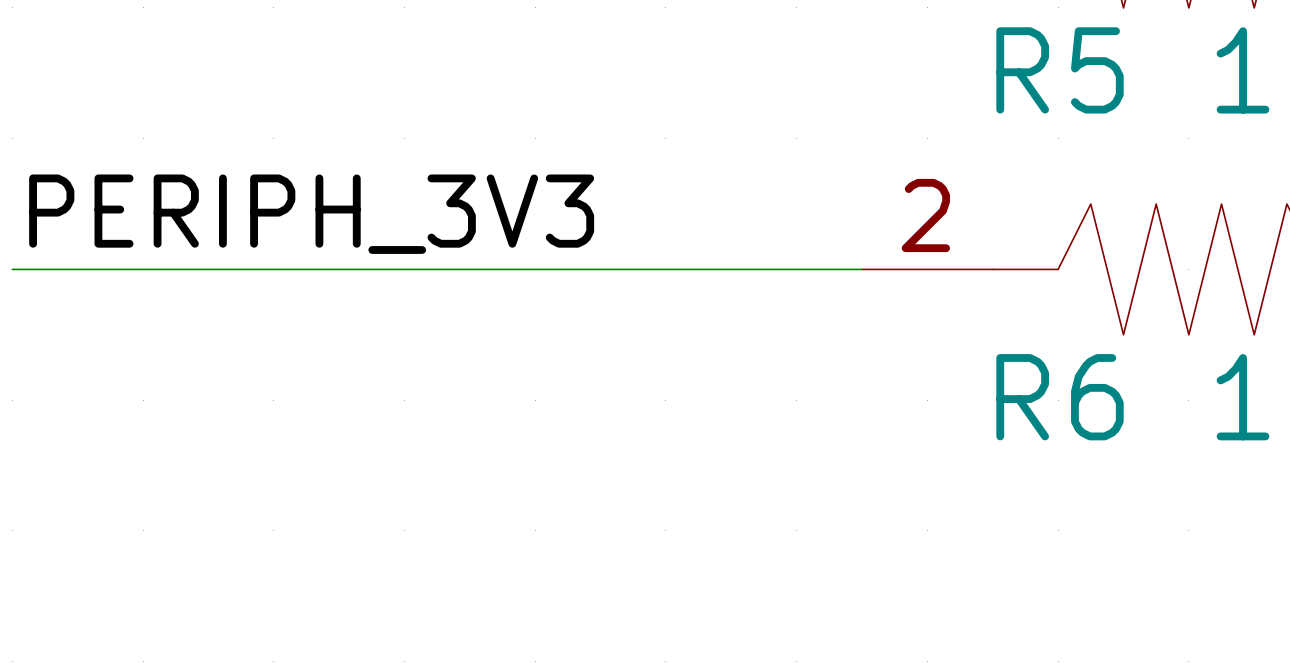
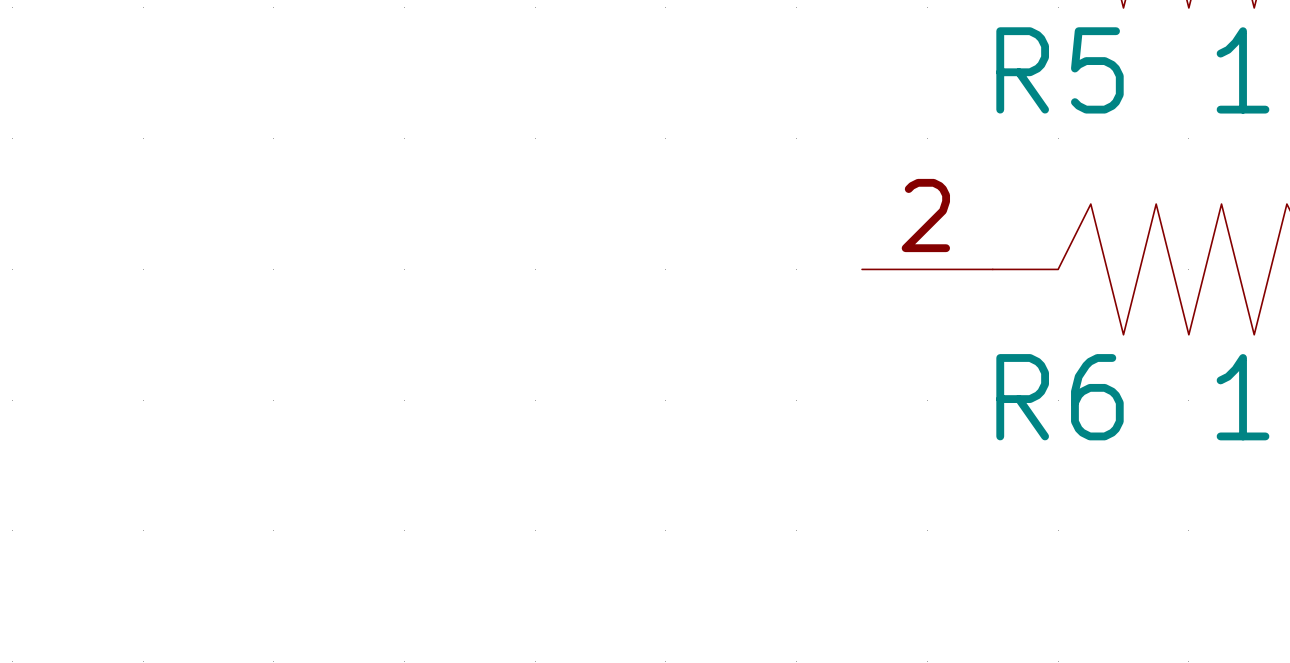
label: PERIPH_3V3 (311, 214) -> none
wire: (12, 269) (862, 269) -> none

